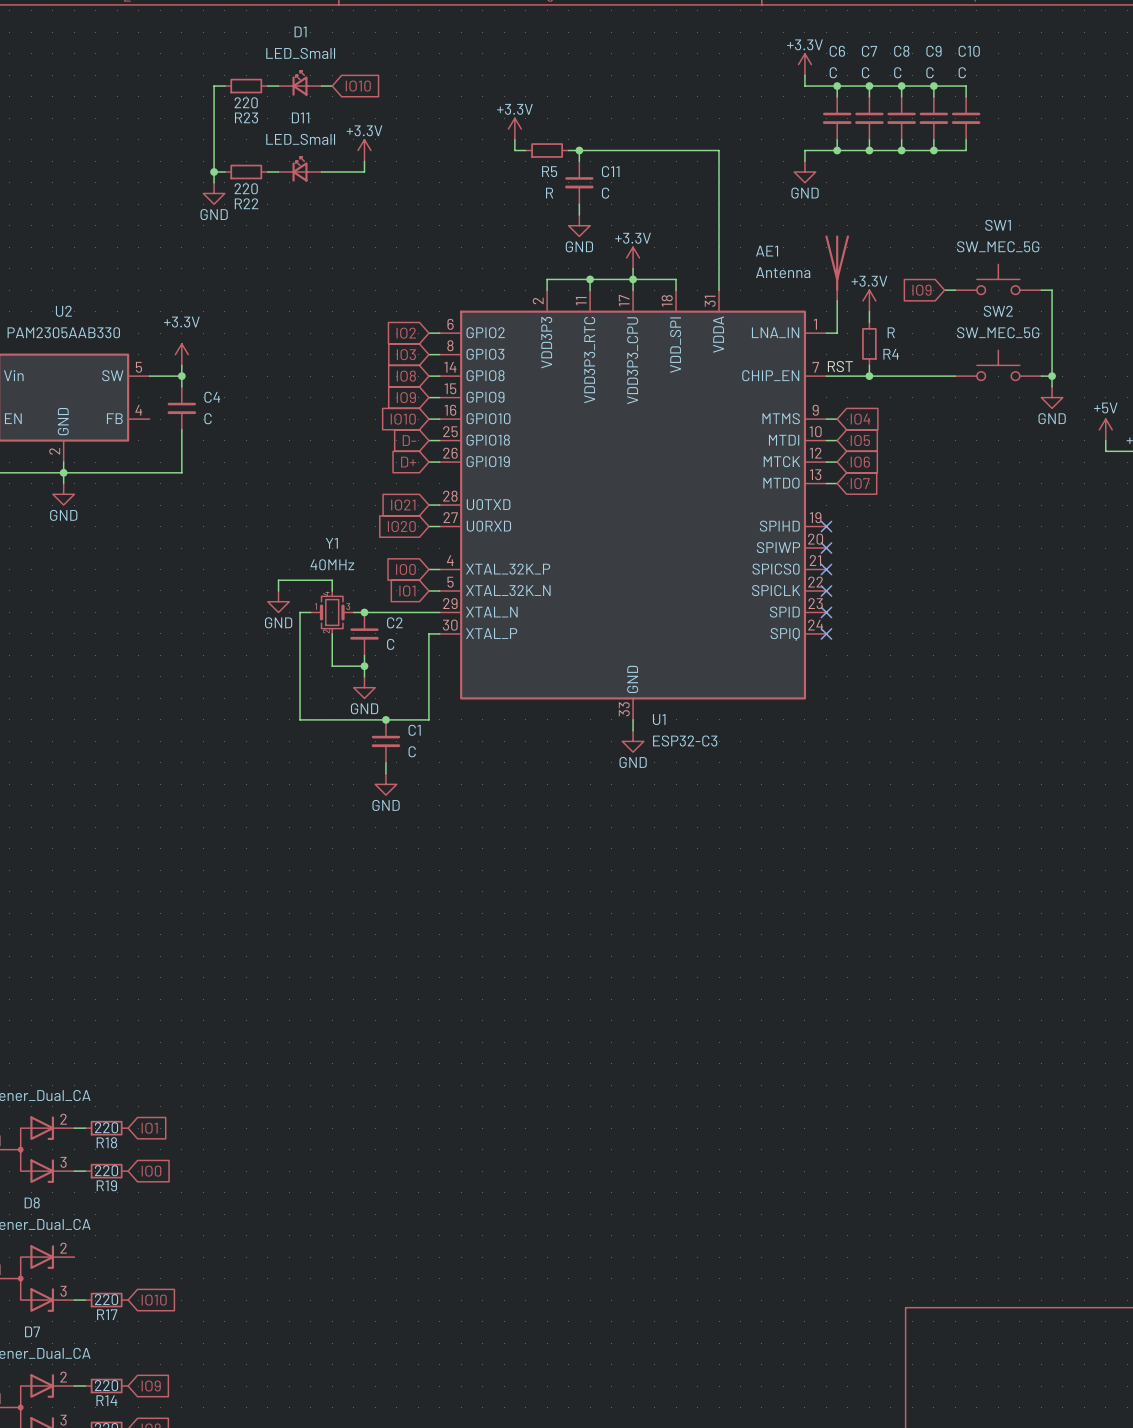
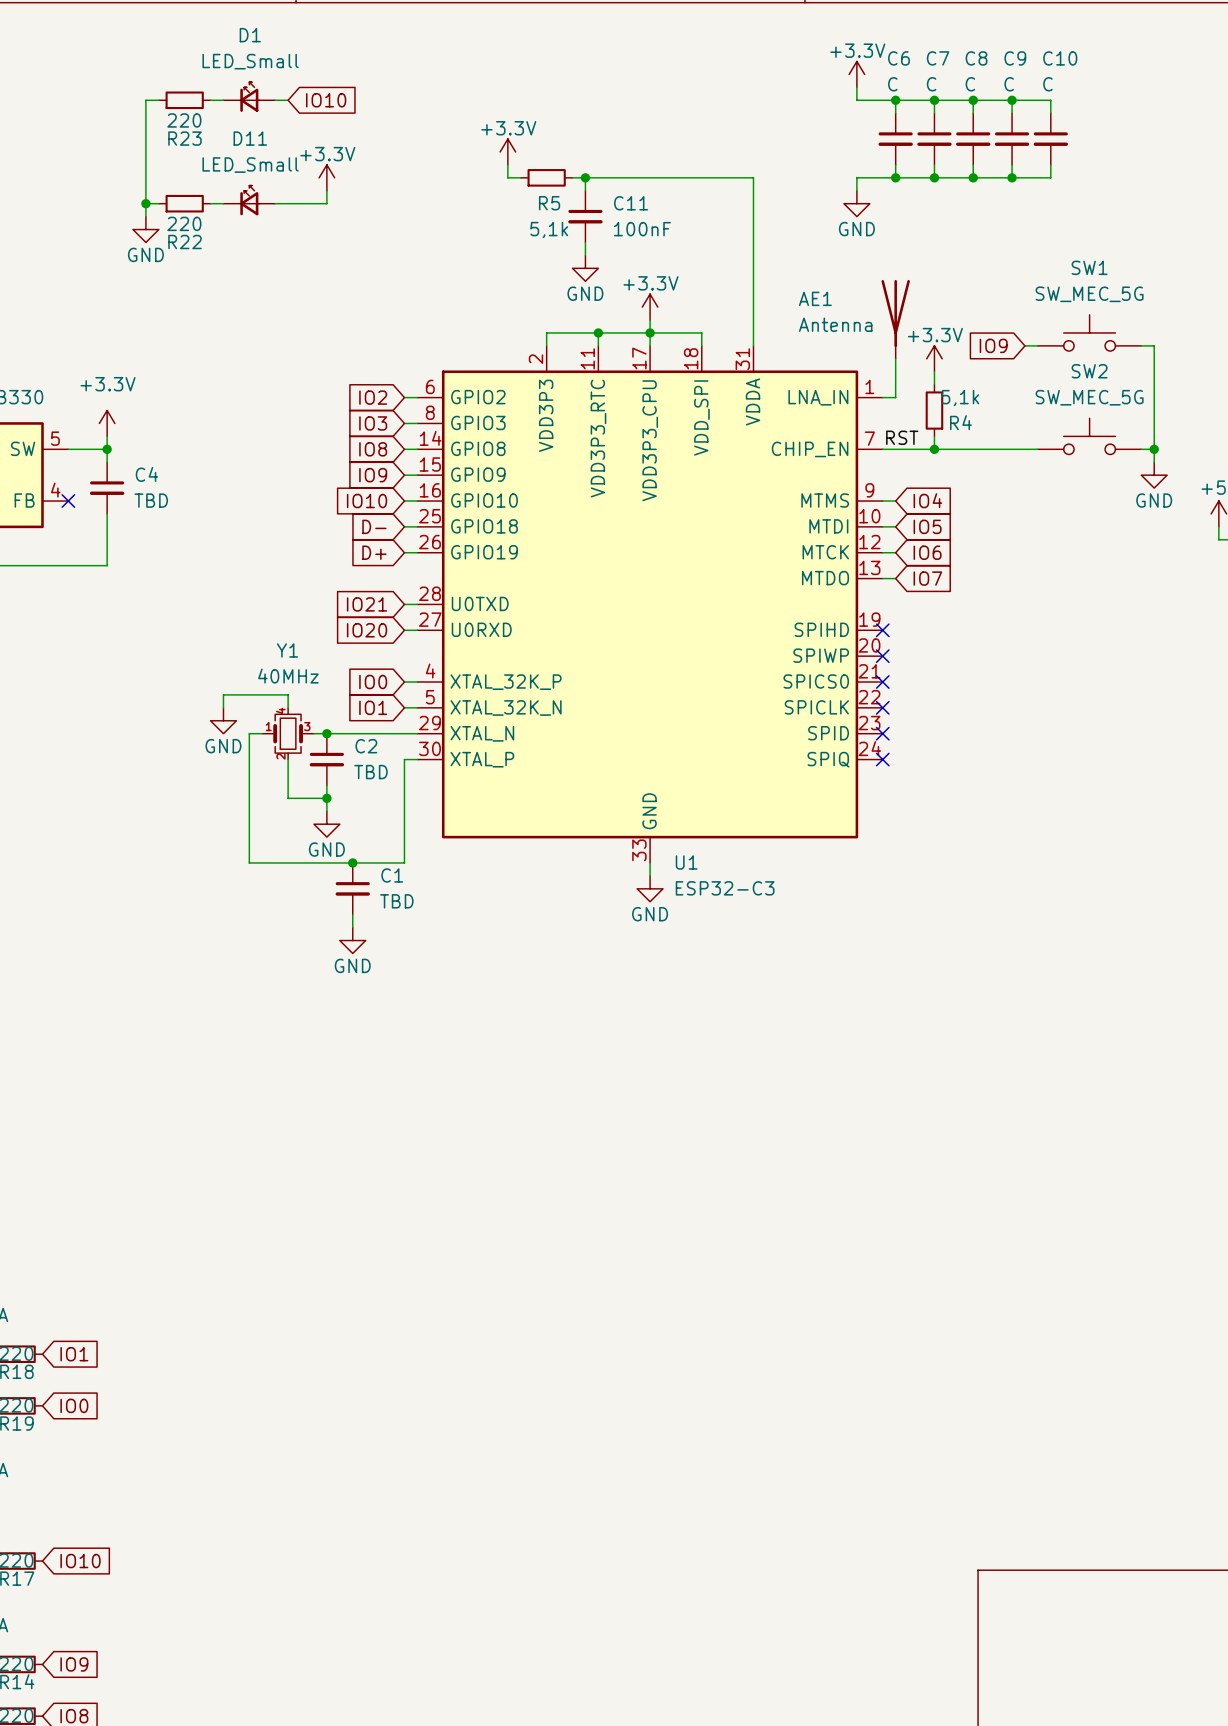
R5 value: R (549, 193) -> 5,1k (549, 229)
C11 value: C (605, 193) -> 100nF (642, 229)
R4 value: R (891, 332) -> 5,1k (960, 398)
C4 value: C (208, 418) -> TBD (151, 500)
no-connect mark: none -> (68, 501)
C2 value: C (390, 644) -> TBD (371, 772)
C1 value: C (412, 751) -> TBD (396, 901)

